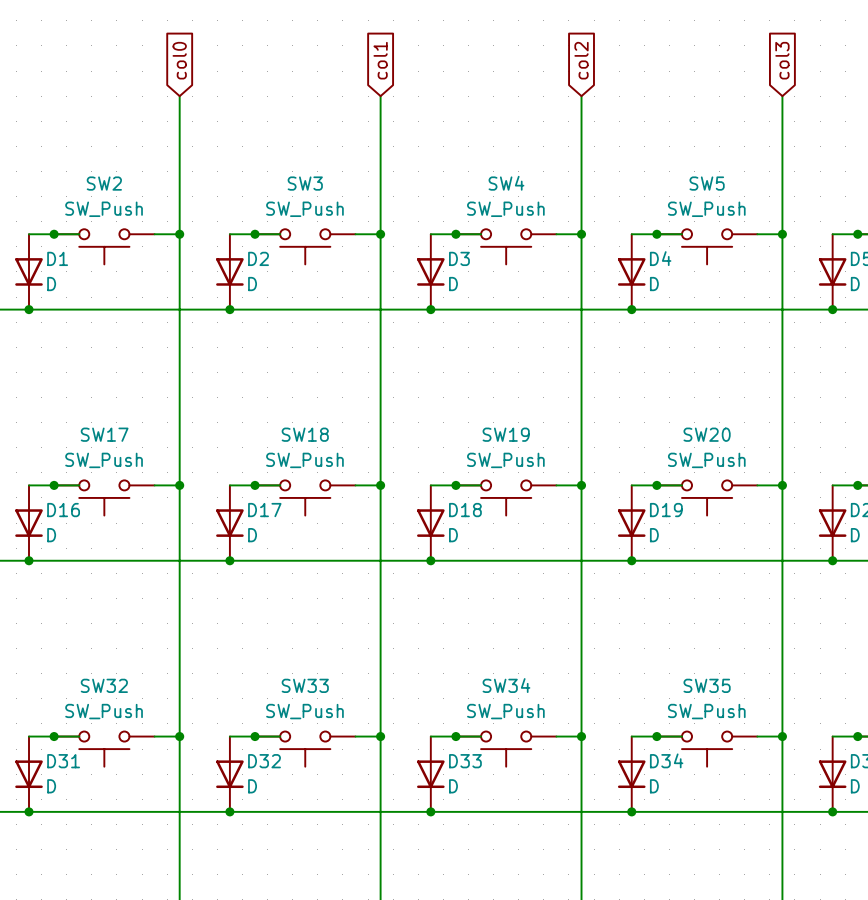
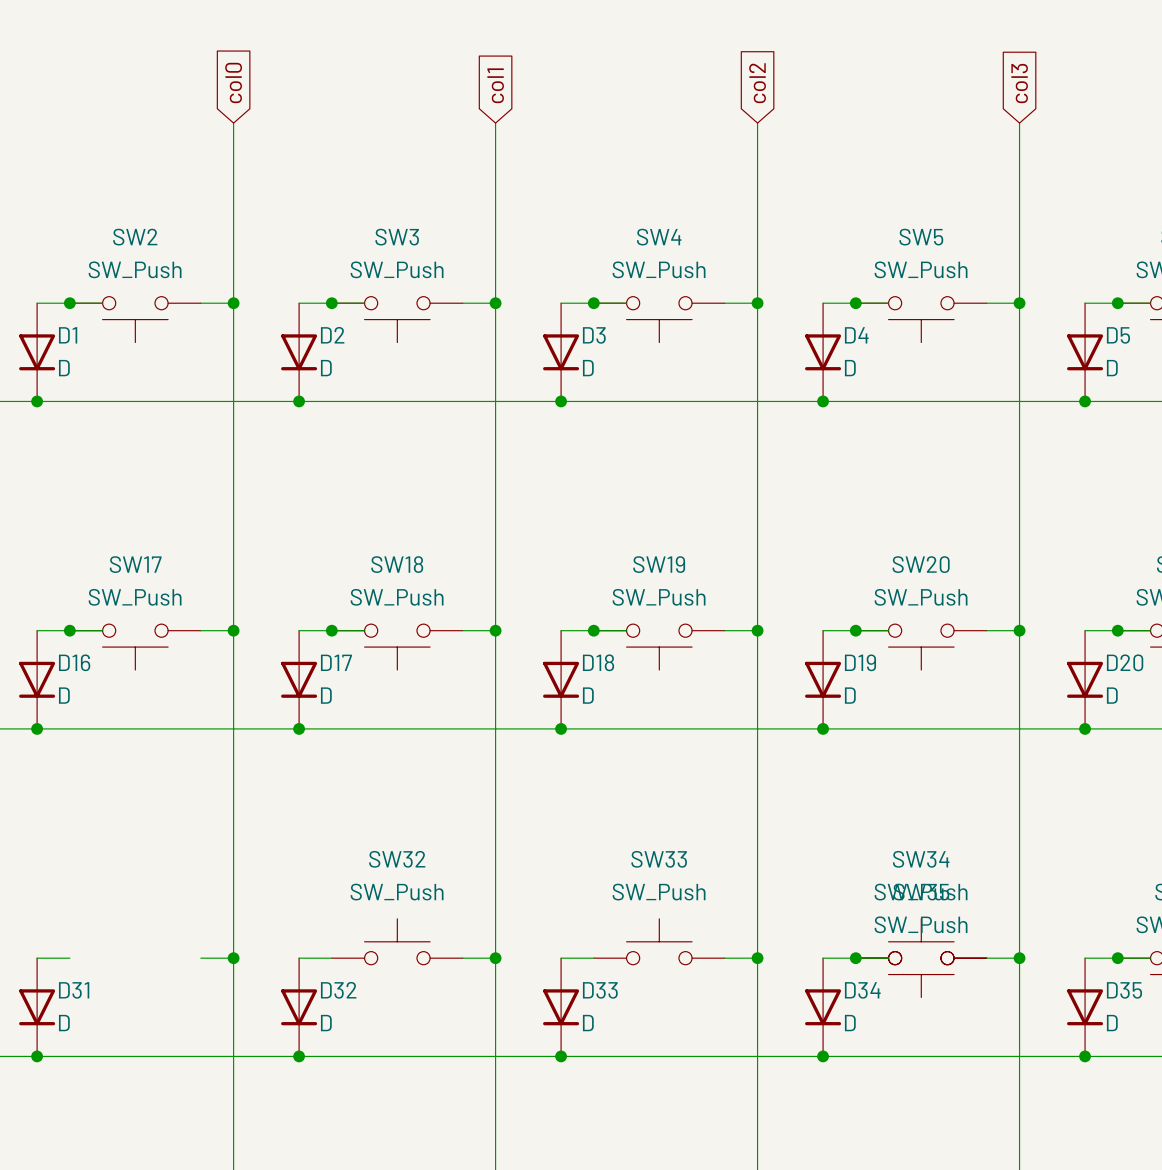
wire: (54, 736) (79, 736) -> none
junction: (54, 736) -> none
junction: (255, 736) -> none
junction: (455, 736) -> none
SW32 rotation: 0° (104, 749) -> 180° (397, 941)
SW32 position: (104, 749) -> (397, 941)
SW33 rotation: 0° (305, 749) -> 180° (659, 941)
SW33 position: (305, 749) -> (659, 941)
SW34 rotation: 0° (506, 749) -> 180° (921, 941)
SW34 position: (506, 749) -> (921, 941)

